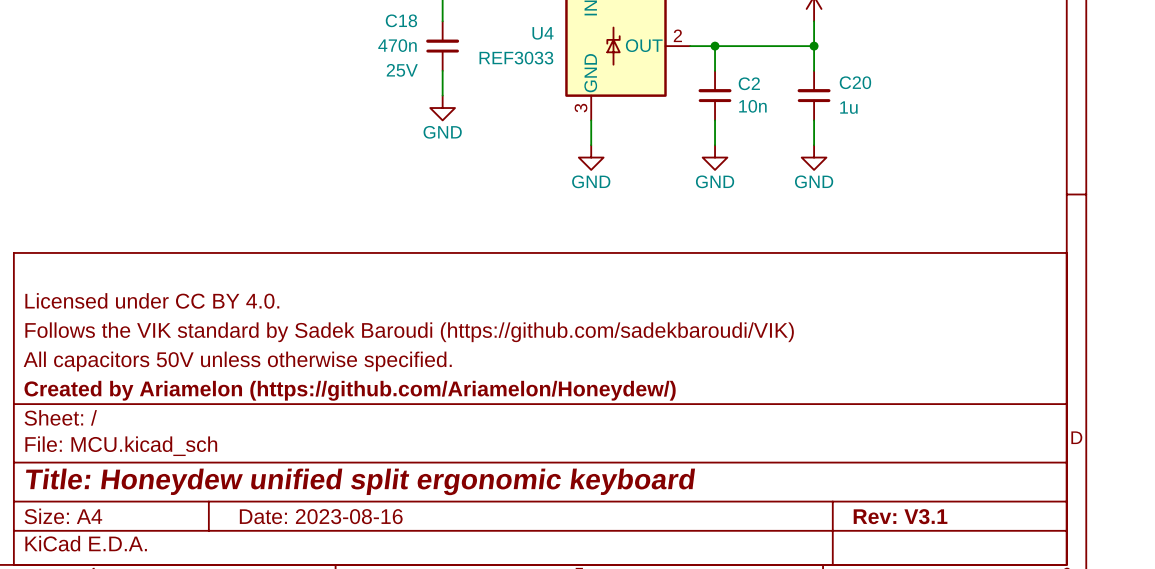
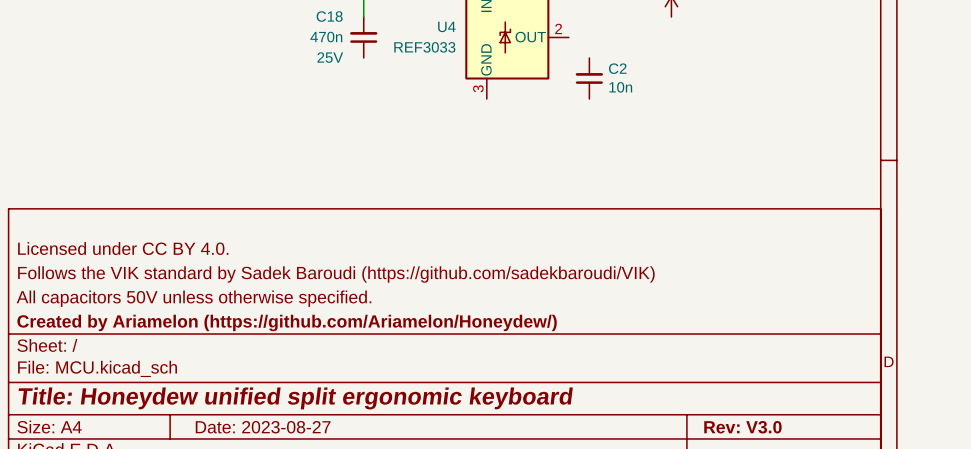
wire: (814, 21) (814, 70) -> none
wire: (690, 46) (814, 46) -> none
wire: (715, 46) (715, 70) -> none
junction: (715, 46) -> none
junction: (814, 46) -> none
wire: (442, 70) (442, 95) -> none
C20: 1u (814, 95) -> none
power symbol: GND (442, 108) -> none
wire: (591, 120) (591, 145) -> none
wire: (715, 120) (715, 145) -> none
wire: (814, 120) (814, 145) -> none
power symbol: GND (591, 157) -> none
power symbol: GND (715, 157) -> none
power symbol: GND (814, 157) -> none
title block: Date: 2023-08-16 (321, 516) -> Date: 2023-08-27 (263, 427)
title block: Rev: V3.1 (900, 516) -> Rev: V3.0 (742, 427)

